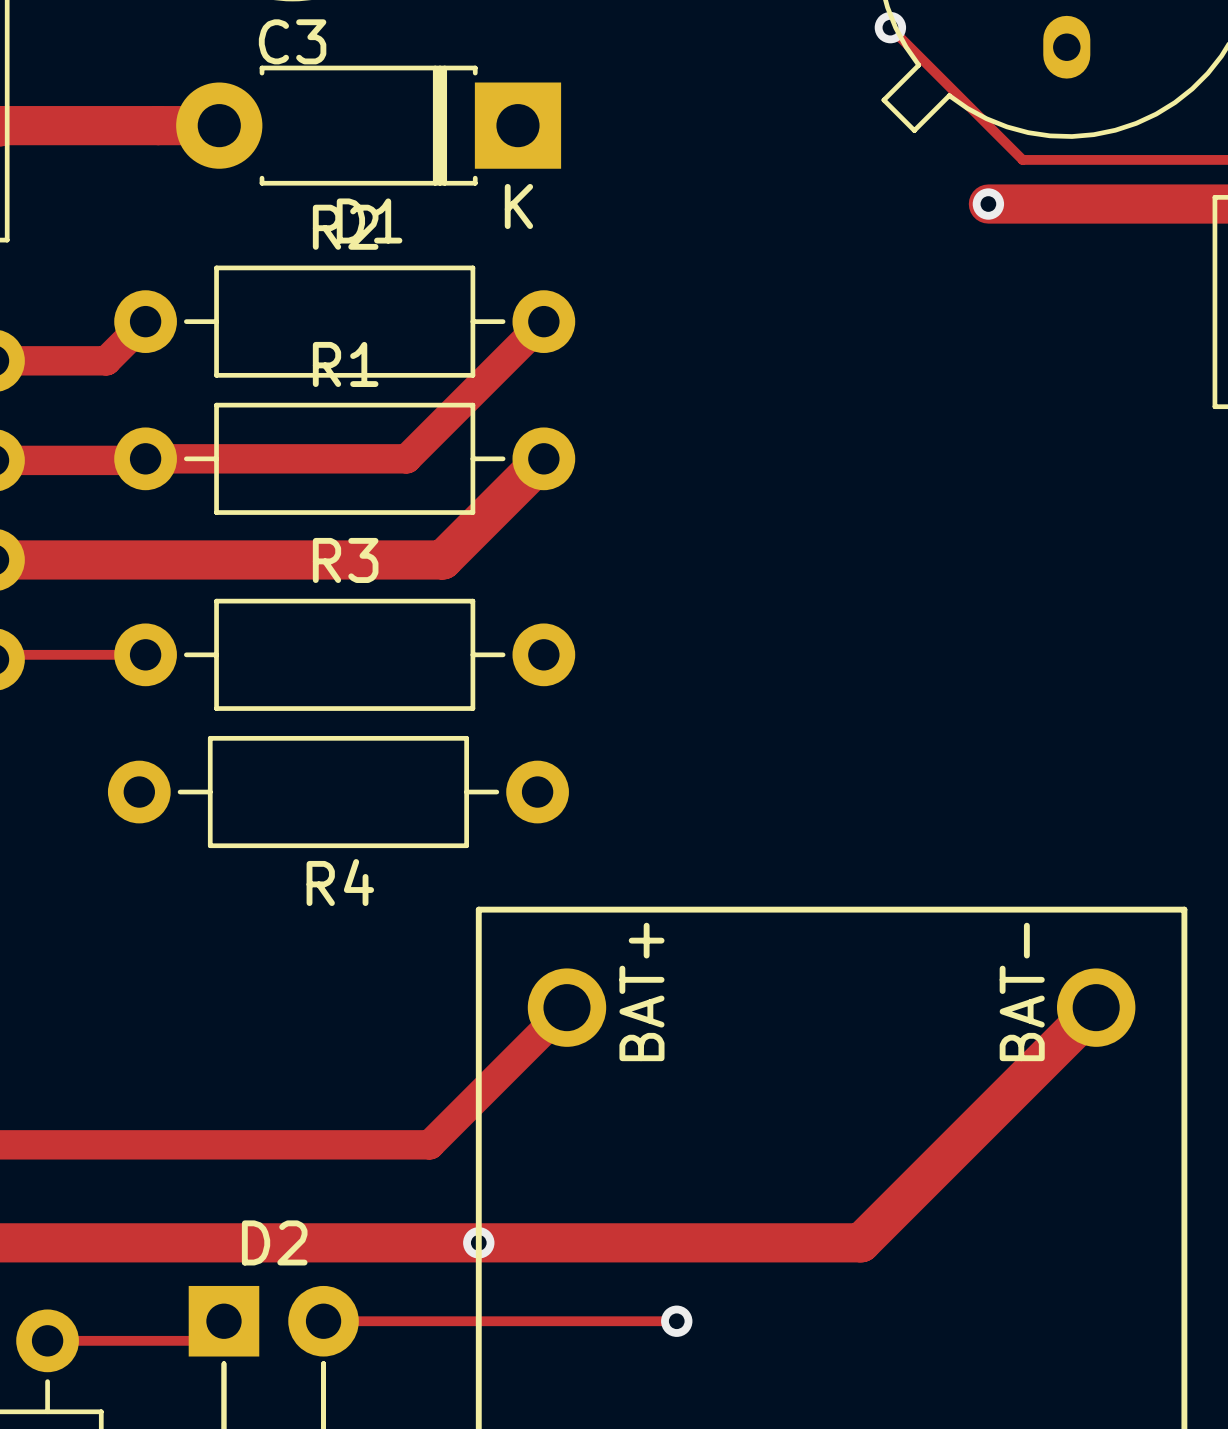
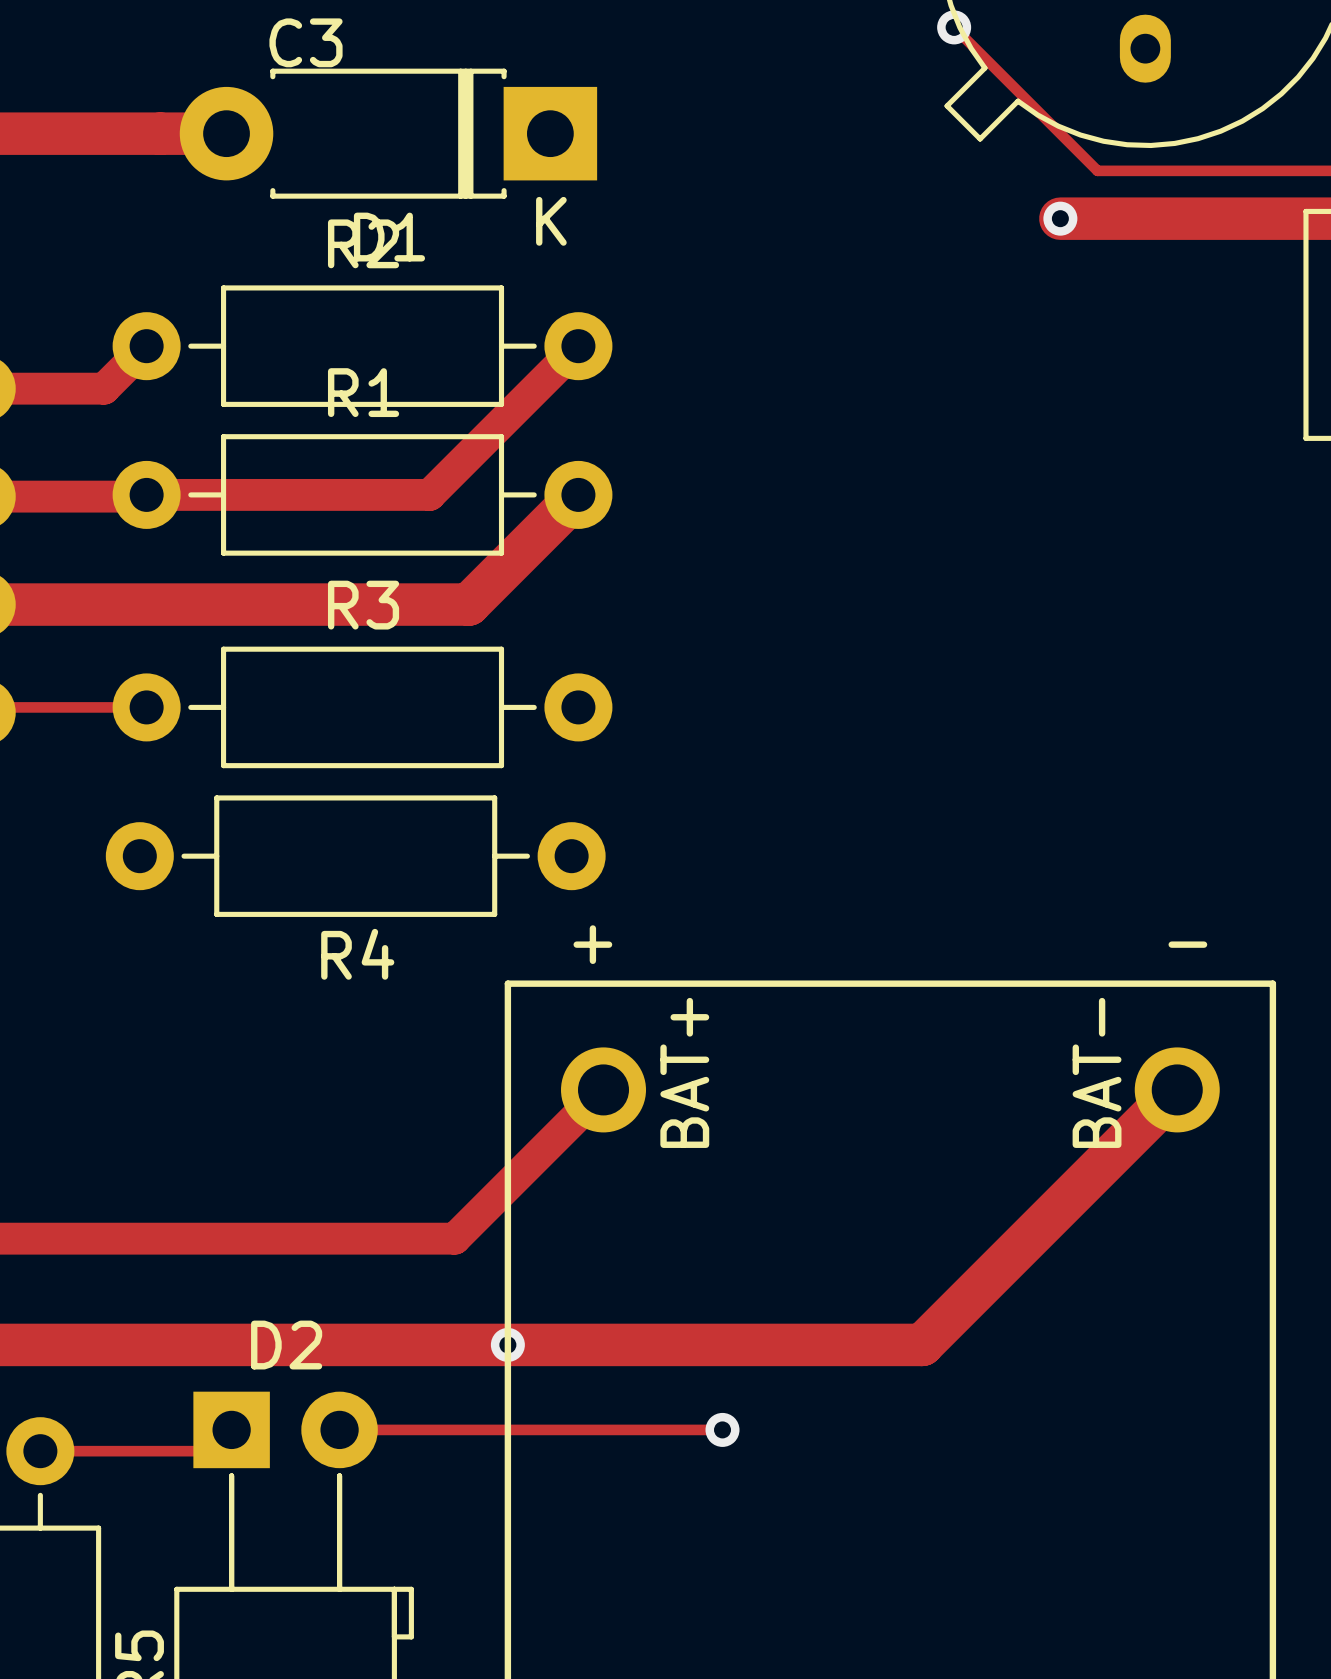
text: none -> + (592, 944)
text: none -> - (1187, 944)

